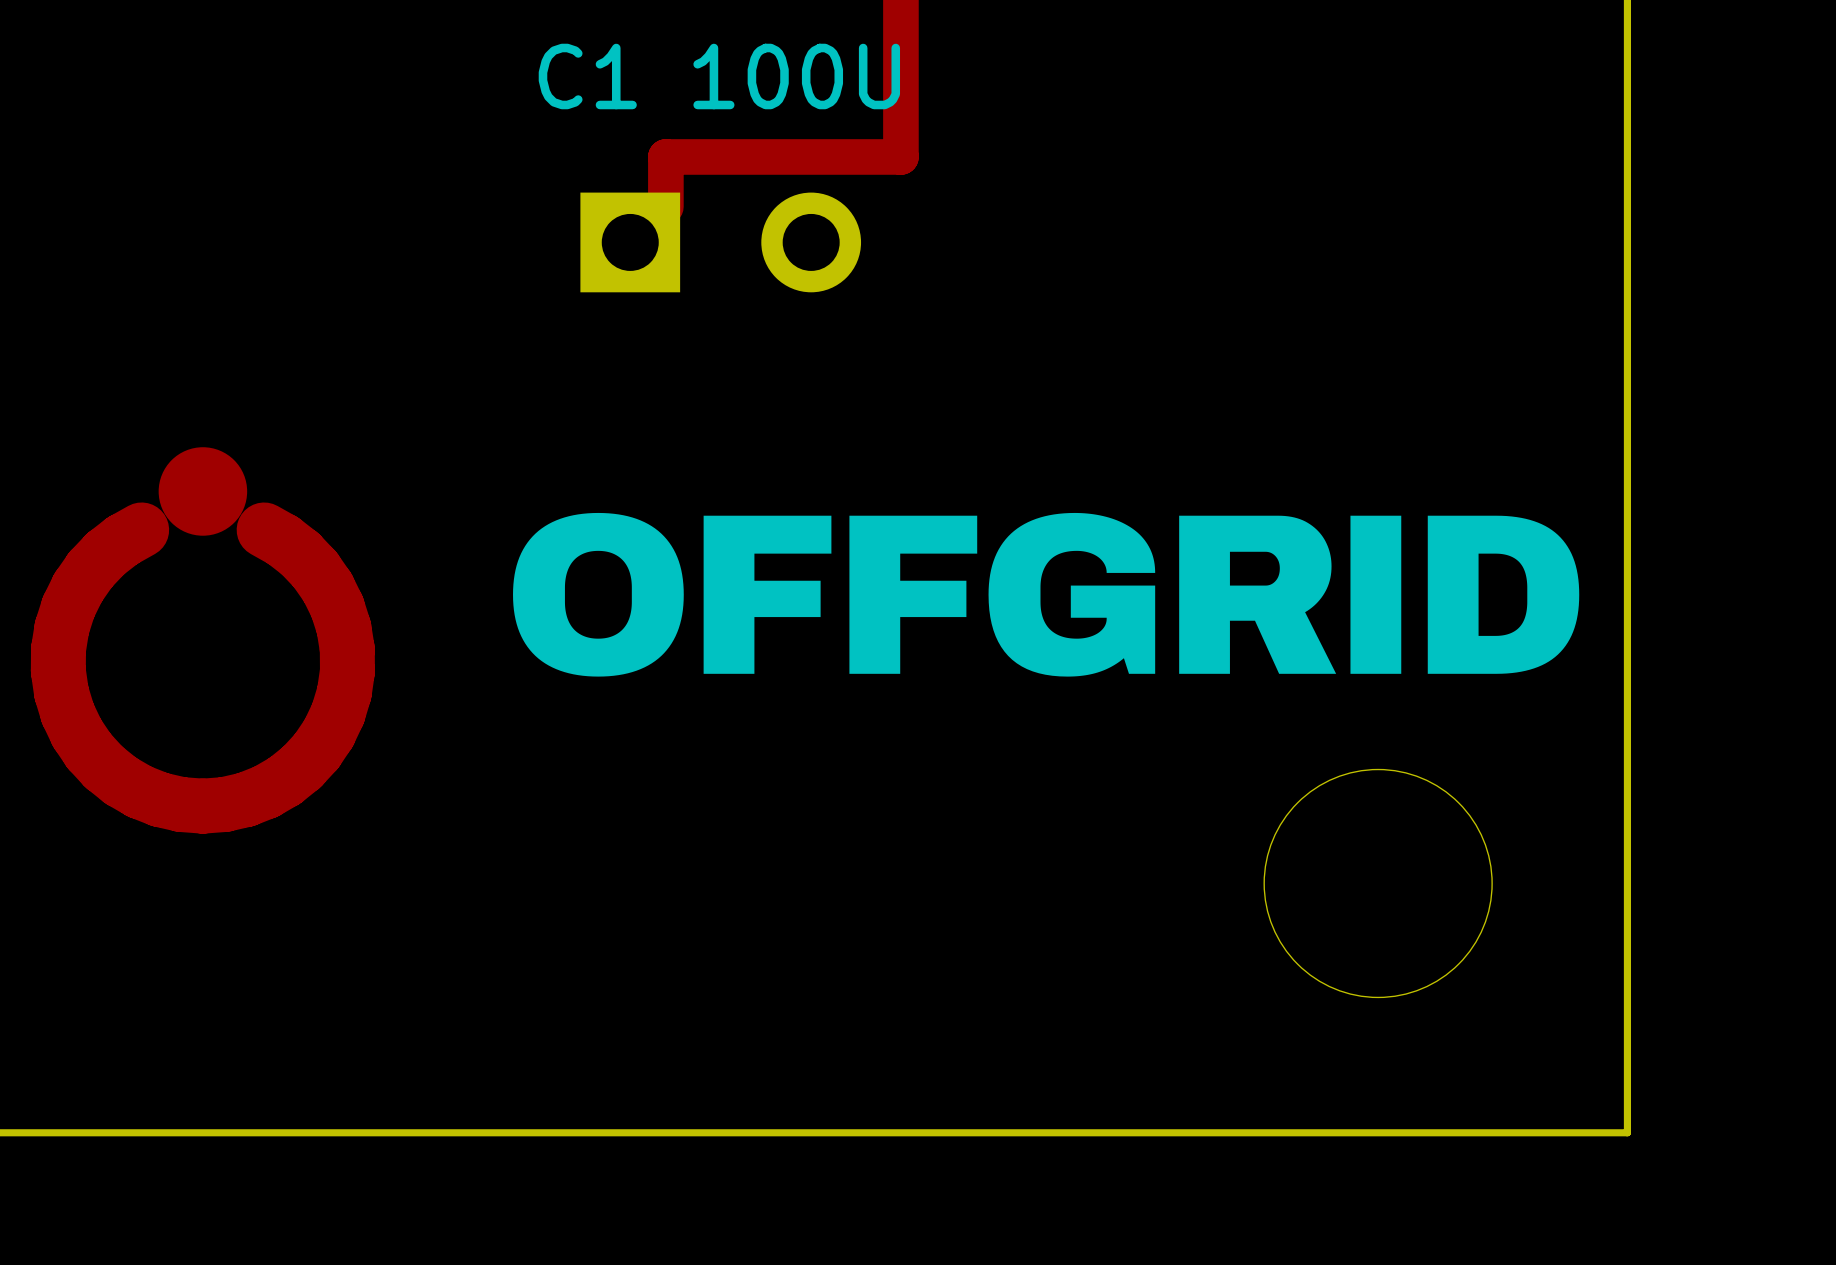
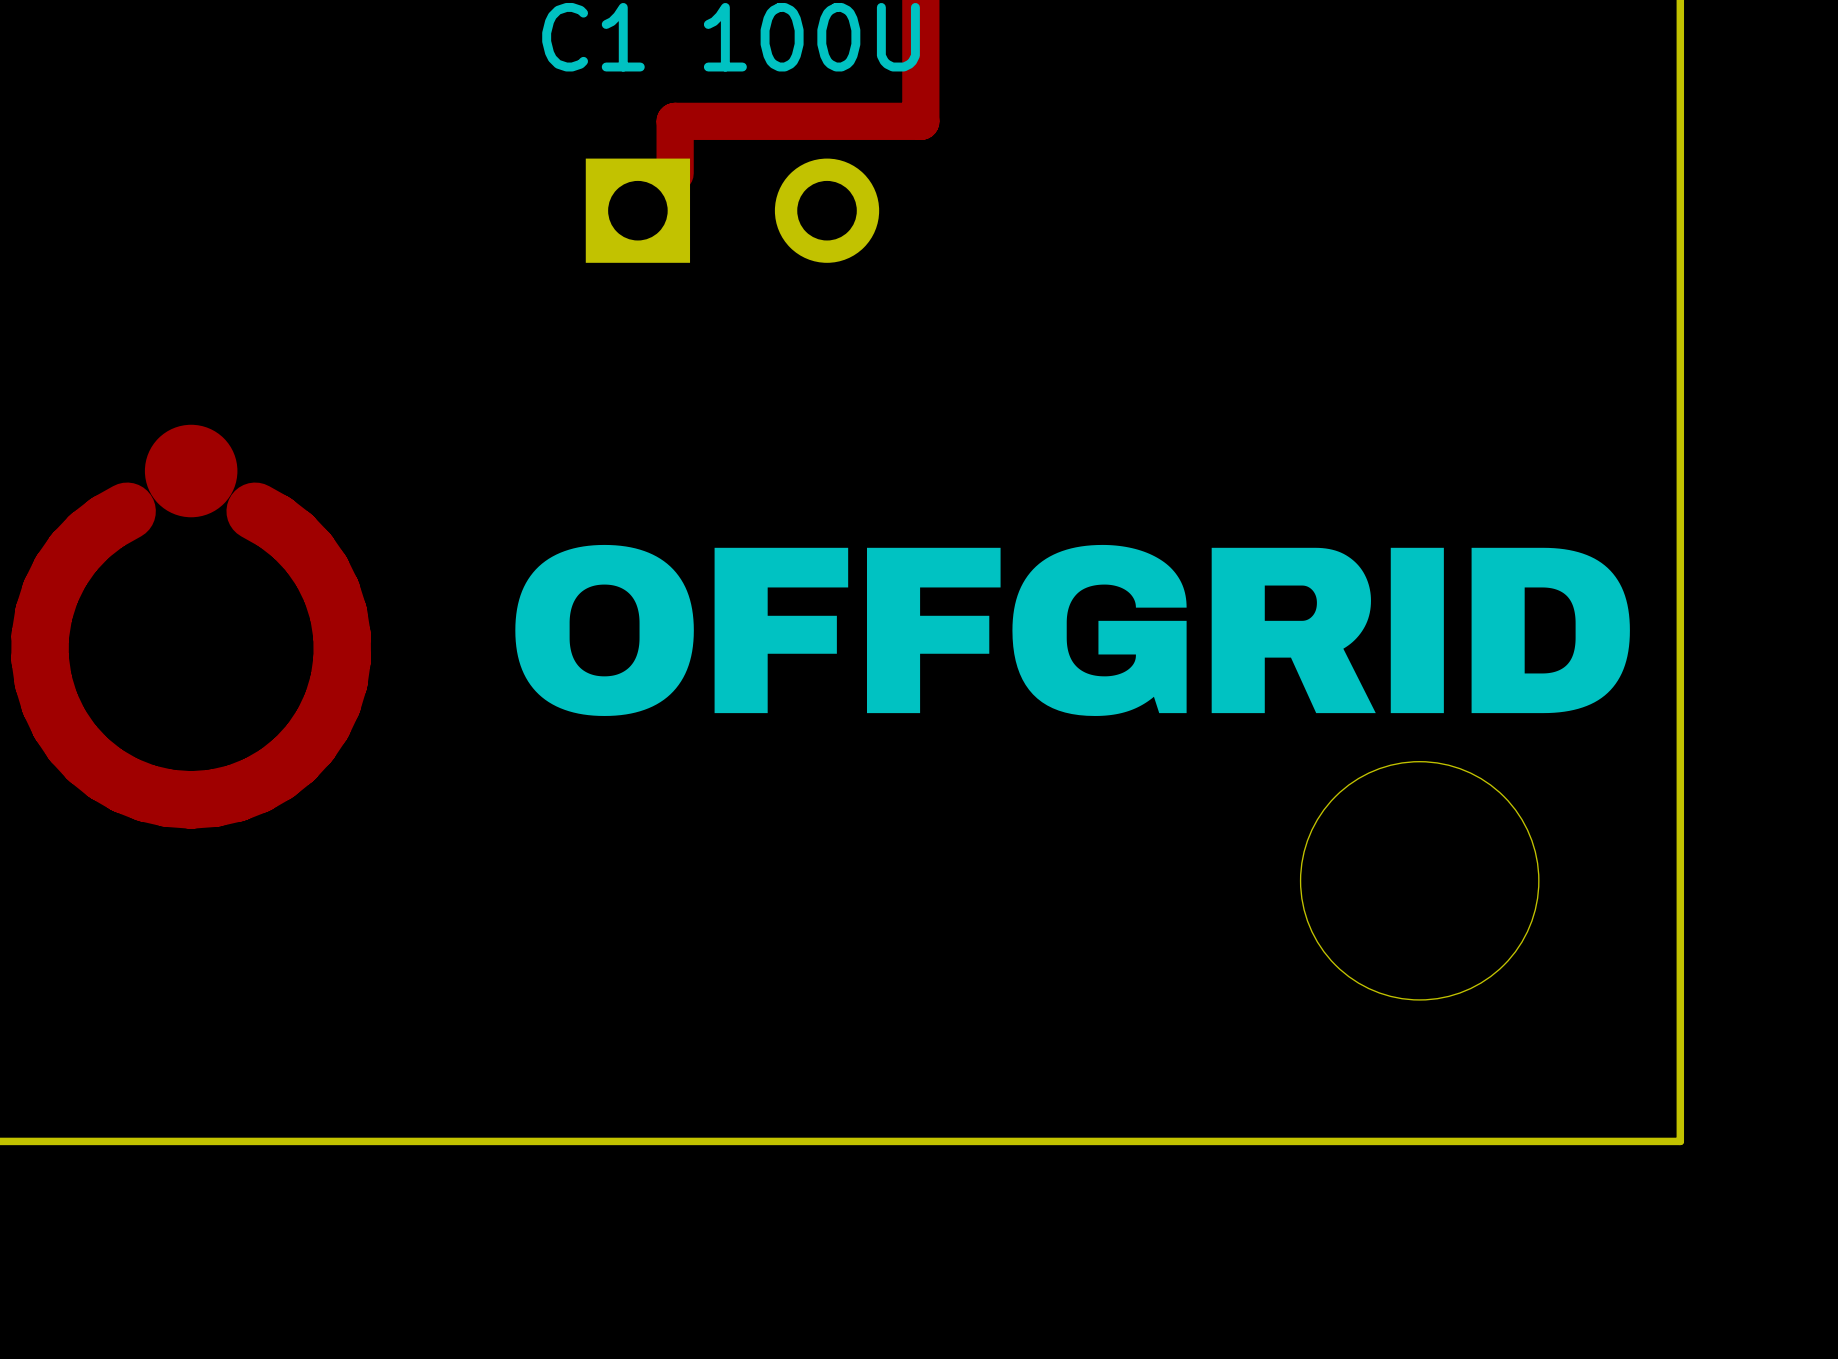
drawing position: (598, 594) -> (604, 630)
drawing position: (767, 594) -> (781, 630)
drawing position: (913, 594) -> (933, 630)
drawing position: (1071, 594) -> (1099, 630)
drawing position: (1257, 594) -> (1293, 630)
drawing position: (1375, 594) -> (1417, 630)
drawing position: (1503, 594) -> (1550, 630)

